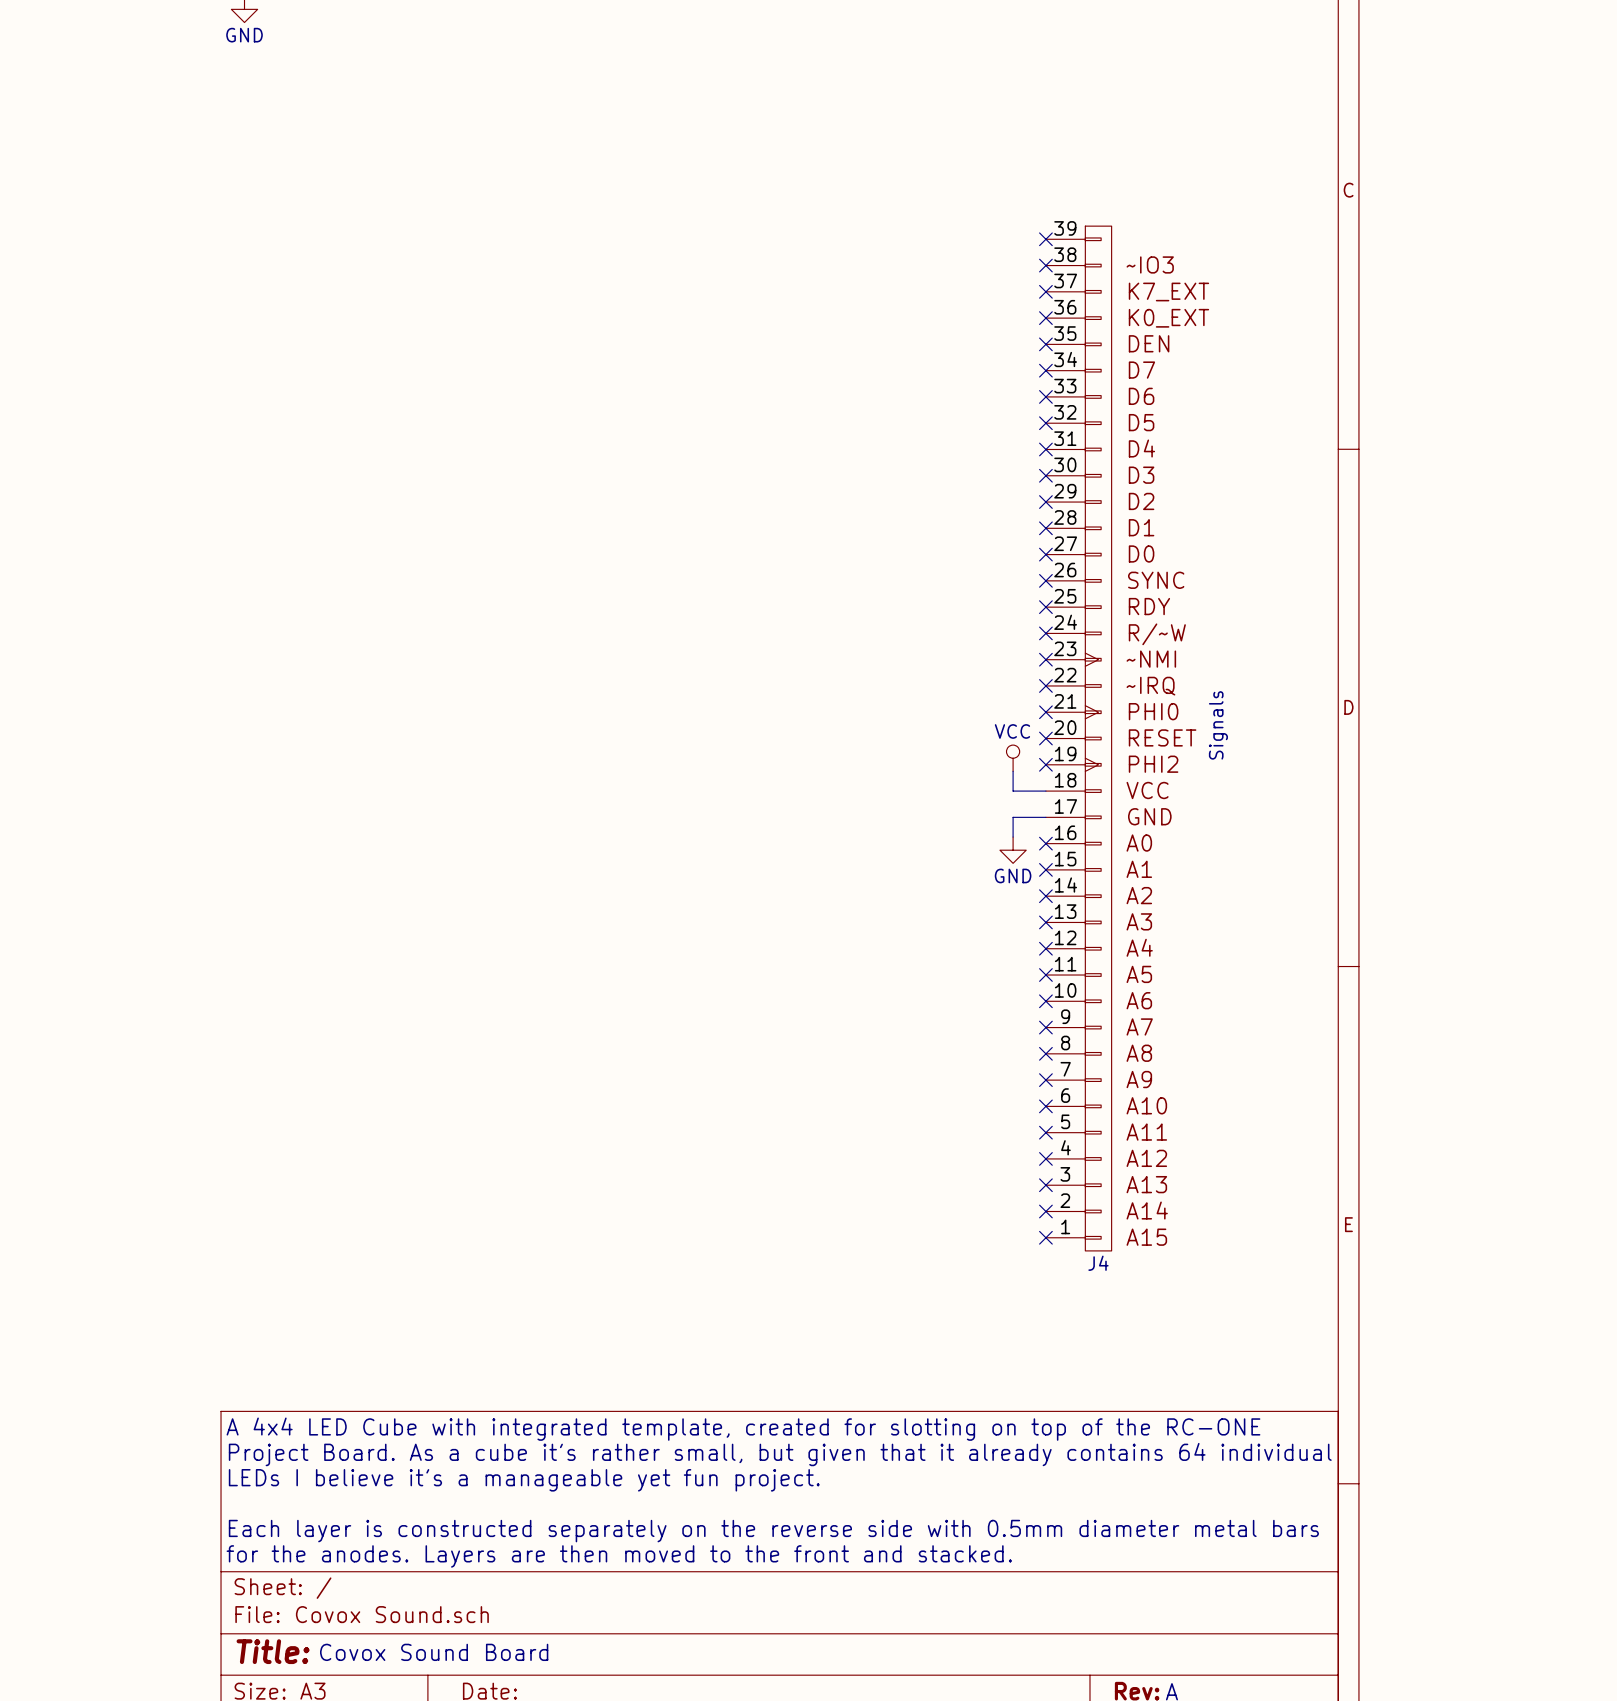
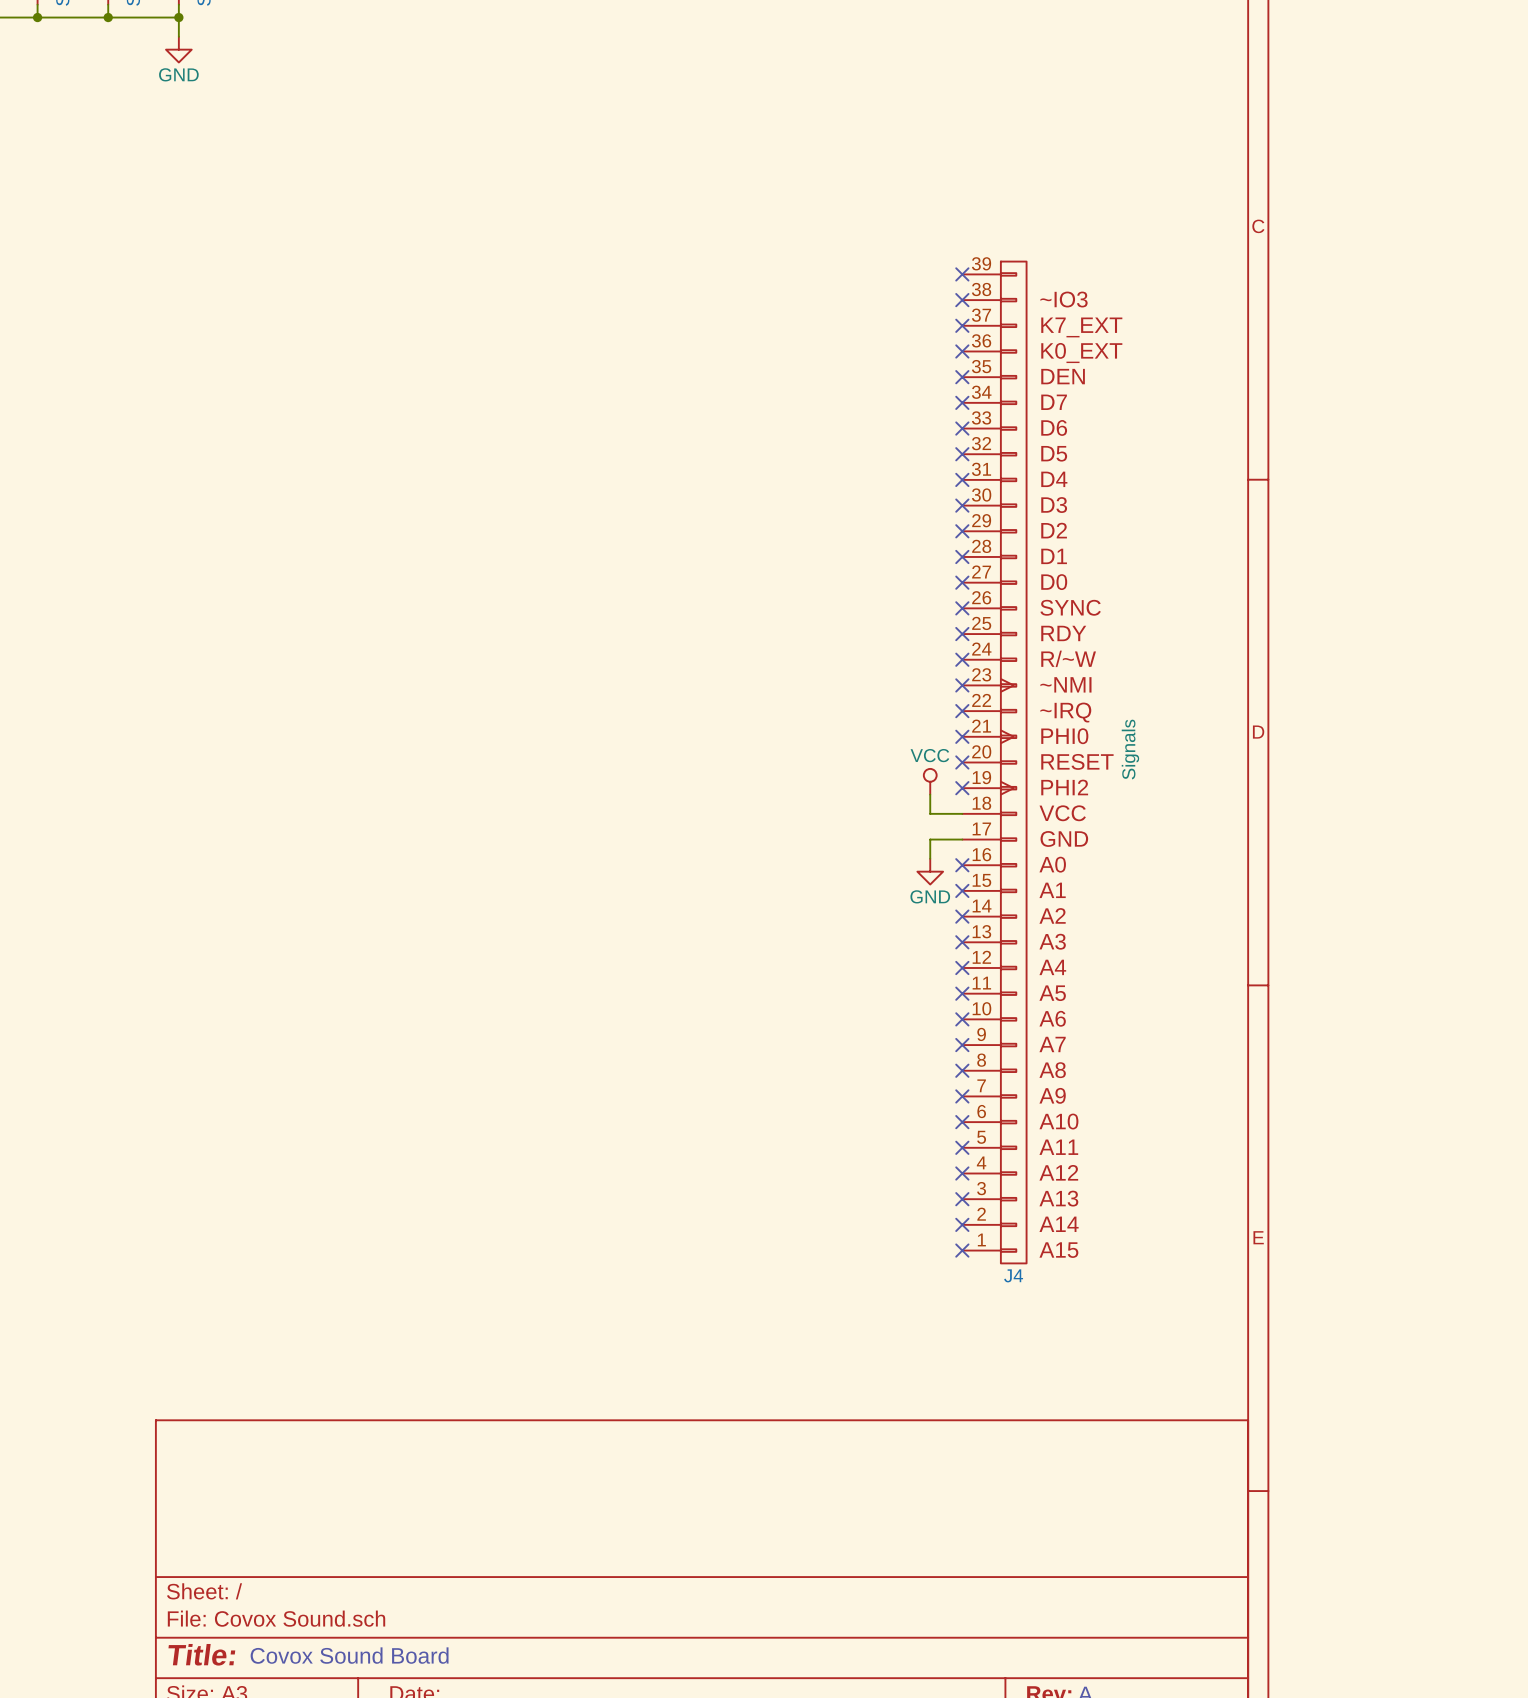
text: A 4x4 LED Cube with integrated template, created for slotting on top of the RC-ONE (743, 1429) -> none
text: Project Board. As a cube it's rather small, but given that it already contains 64 individual (780, 1454) -> none
text: LEDs I believe it's a manageable yet fun project. (524, 1480) -> none
text: Each layer is constructed separately on the reverse side with 0.5mm diameter metal bars (773, 1531) -> none
text: for the anodes. Layers are then moved to the front and stacked. (619, 1556) -> none

